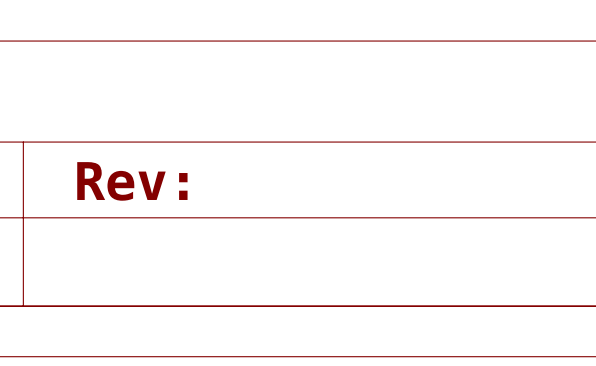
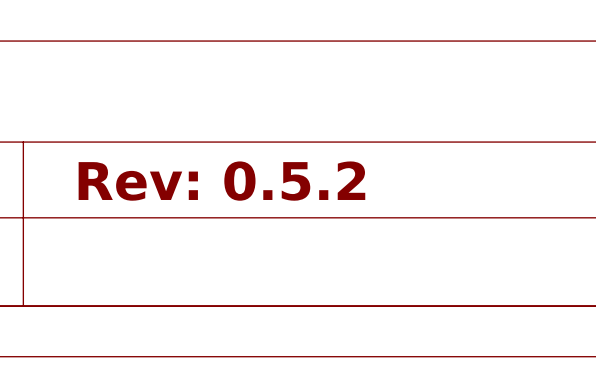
title block: Rev: (132, 181) -> Rev: 0.5.2 (221, 181)

